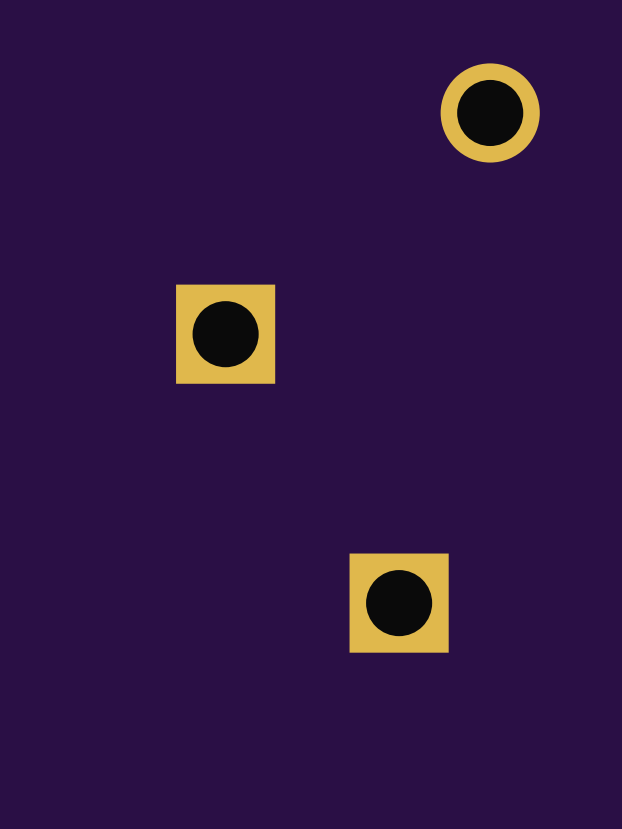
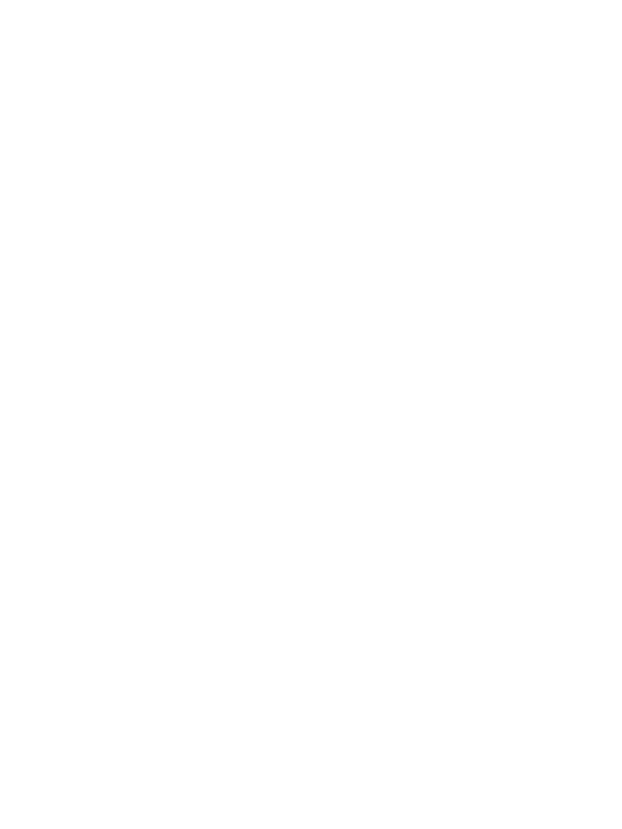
part: (490, 112) -> none
part: (225, 334) -> none
part: (399, 603) -> none

